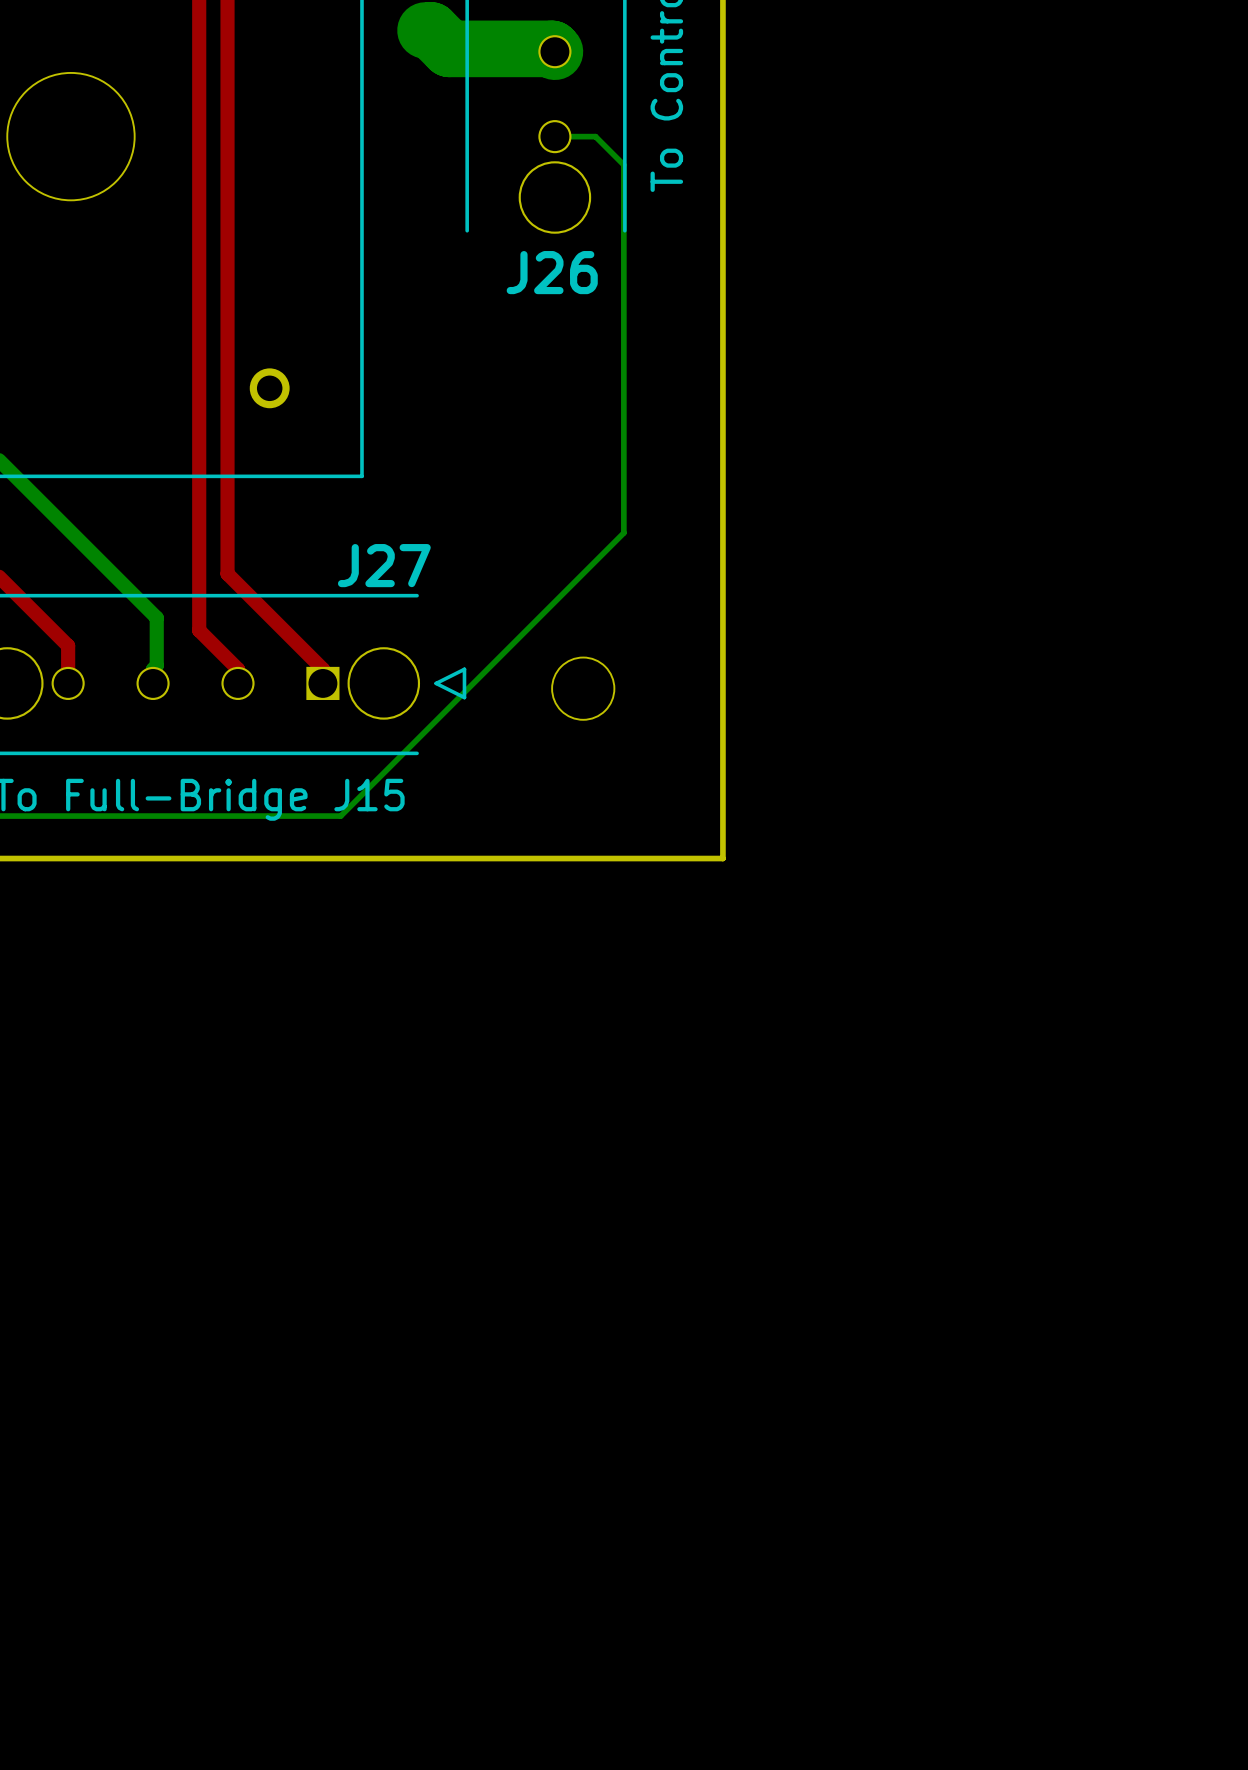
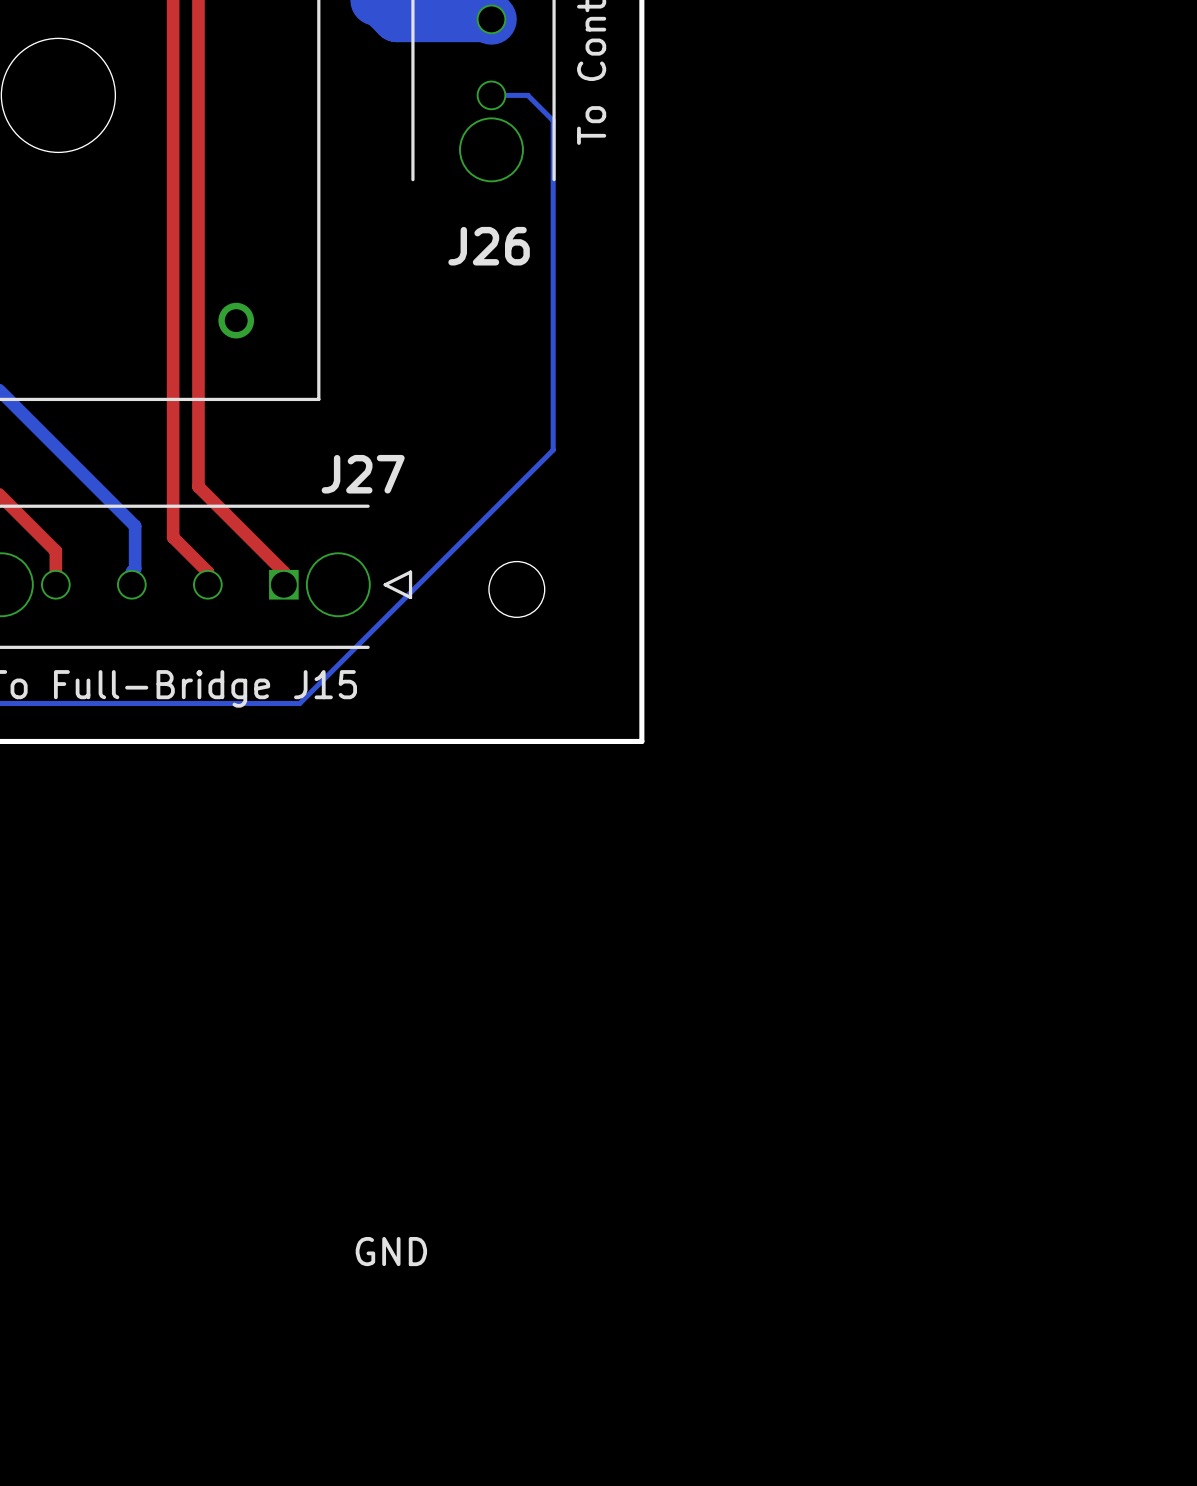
J26 name position: J26 (552, 272) -> J26 (489, 246)
J27 name position: J27 (384, 565) -> J27 (363, 474)
text: none -> GND (391, 1251)

